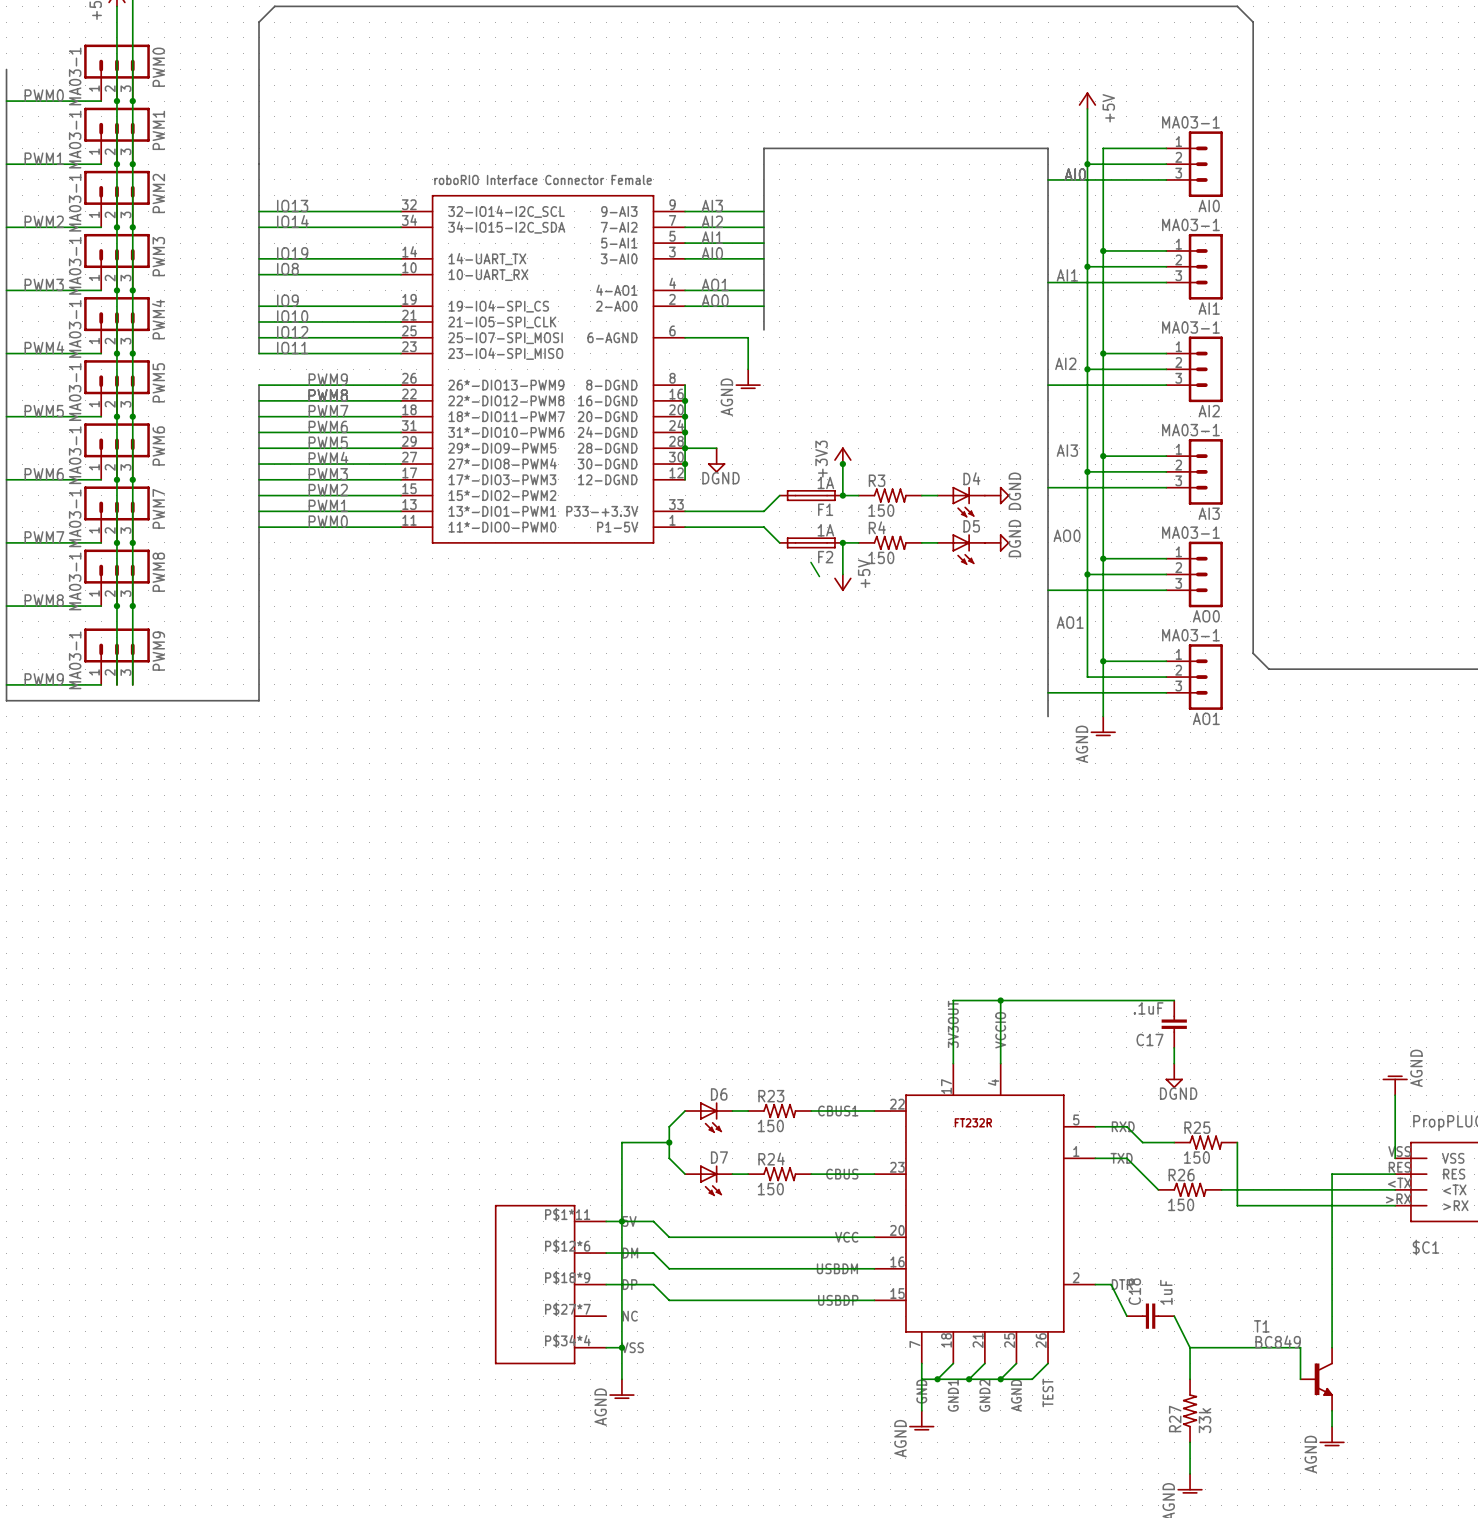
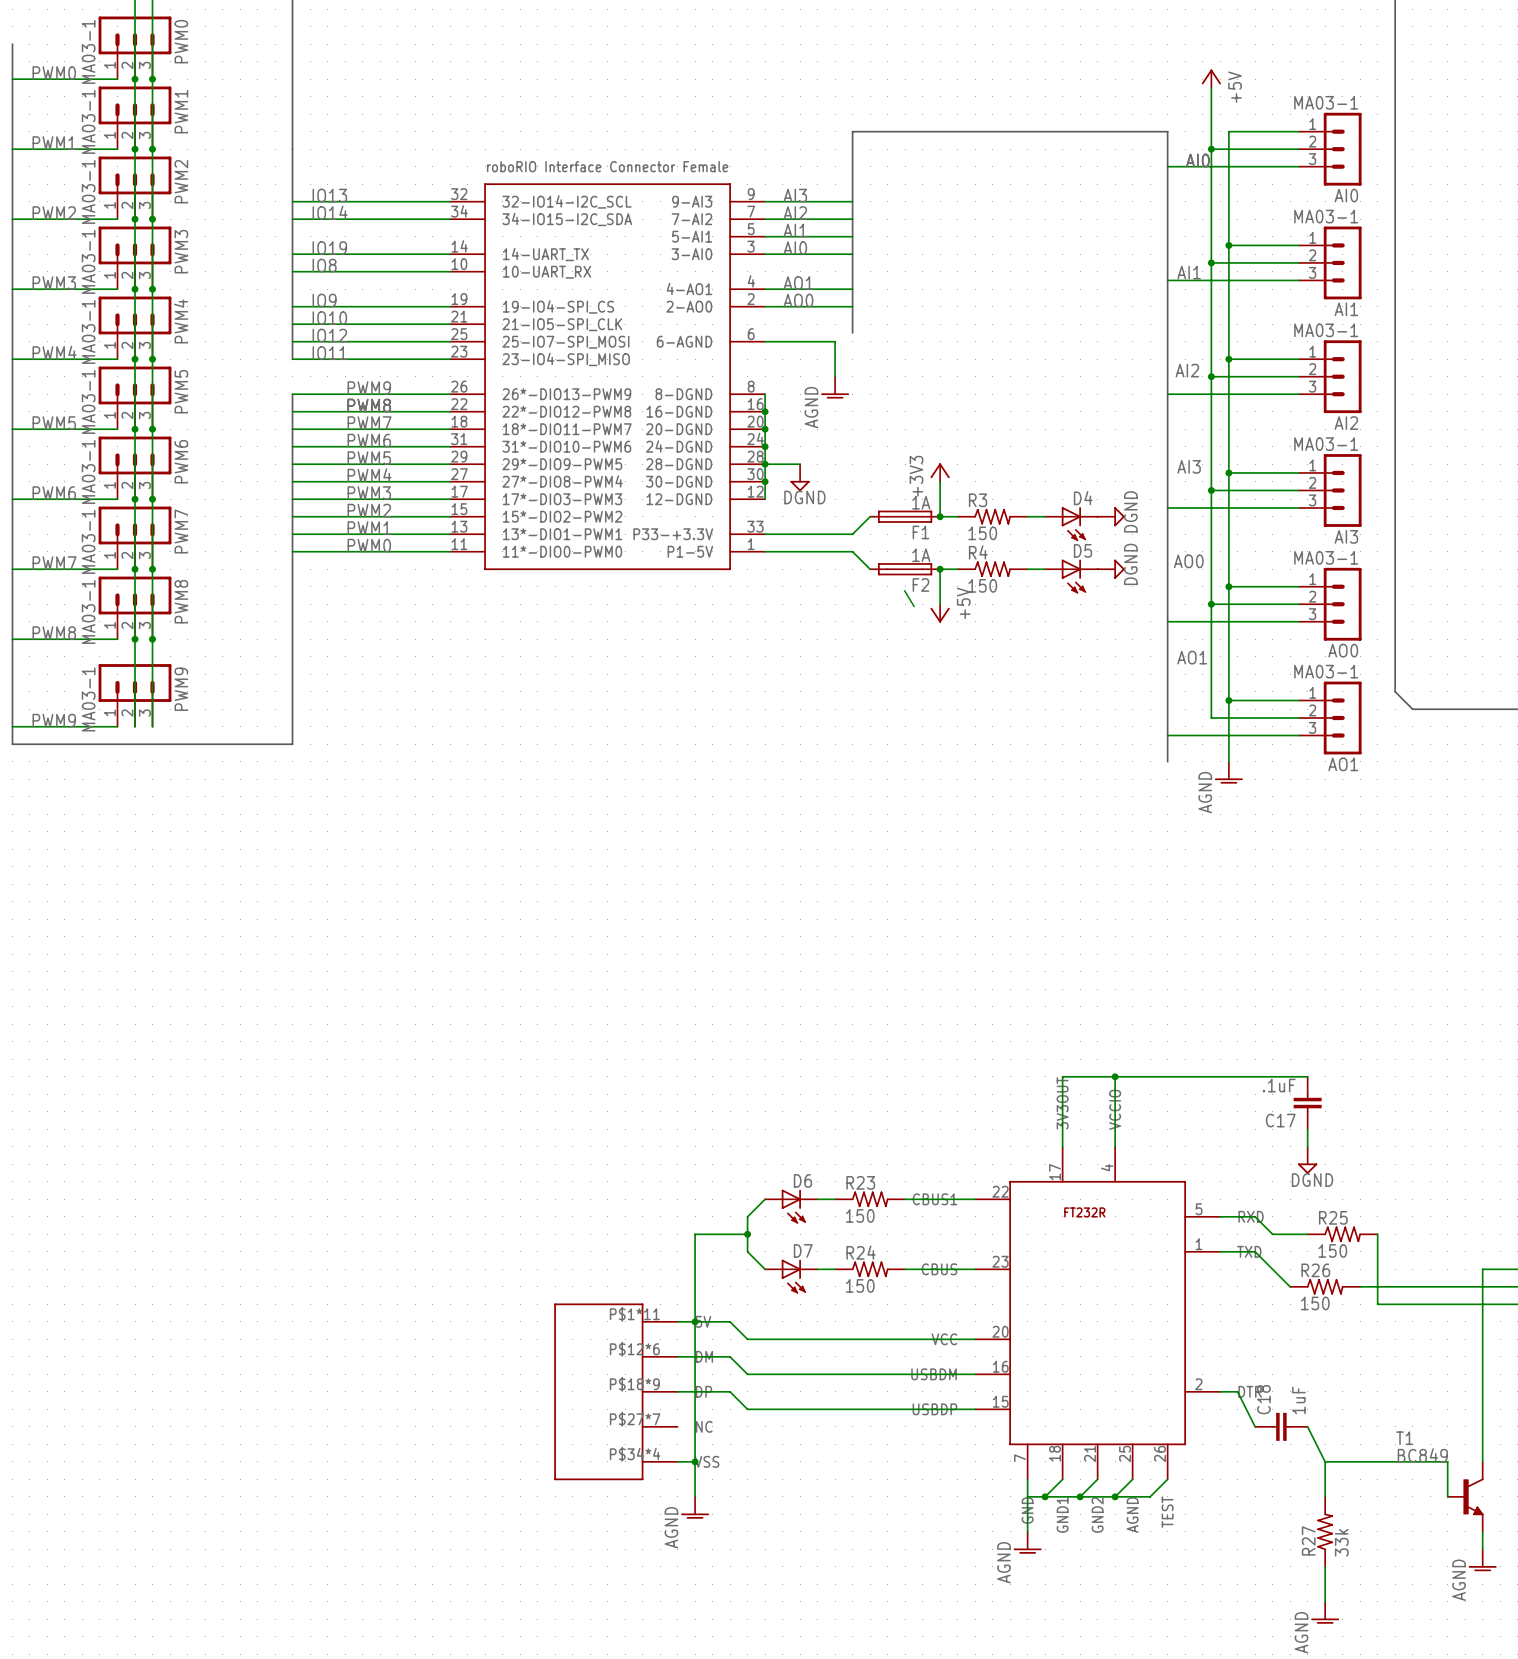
junction: (842, 464) -> none

